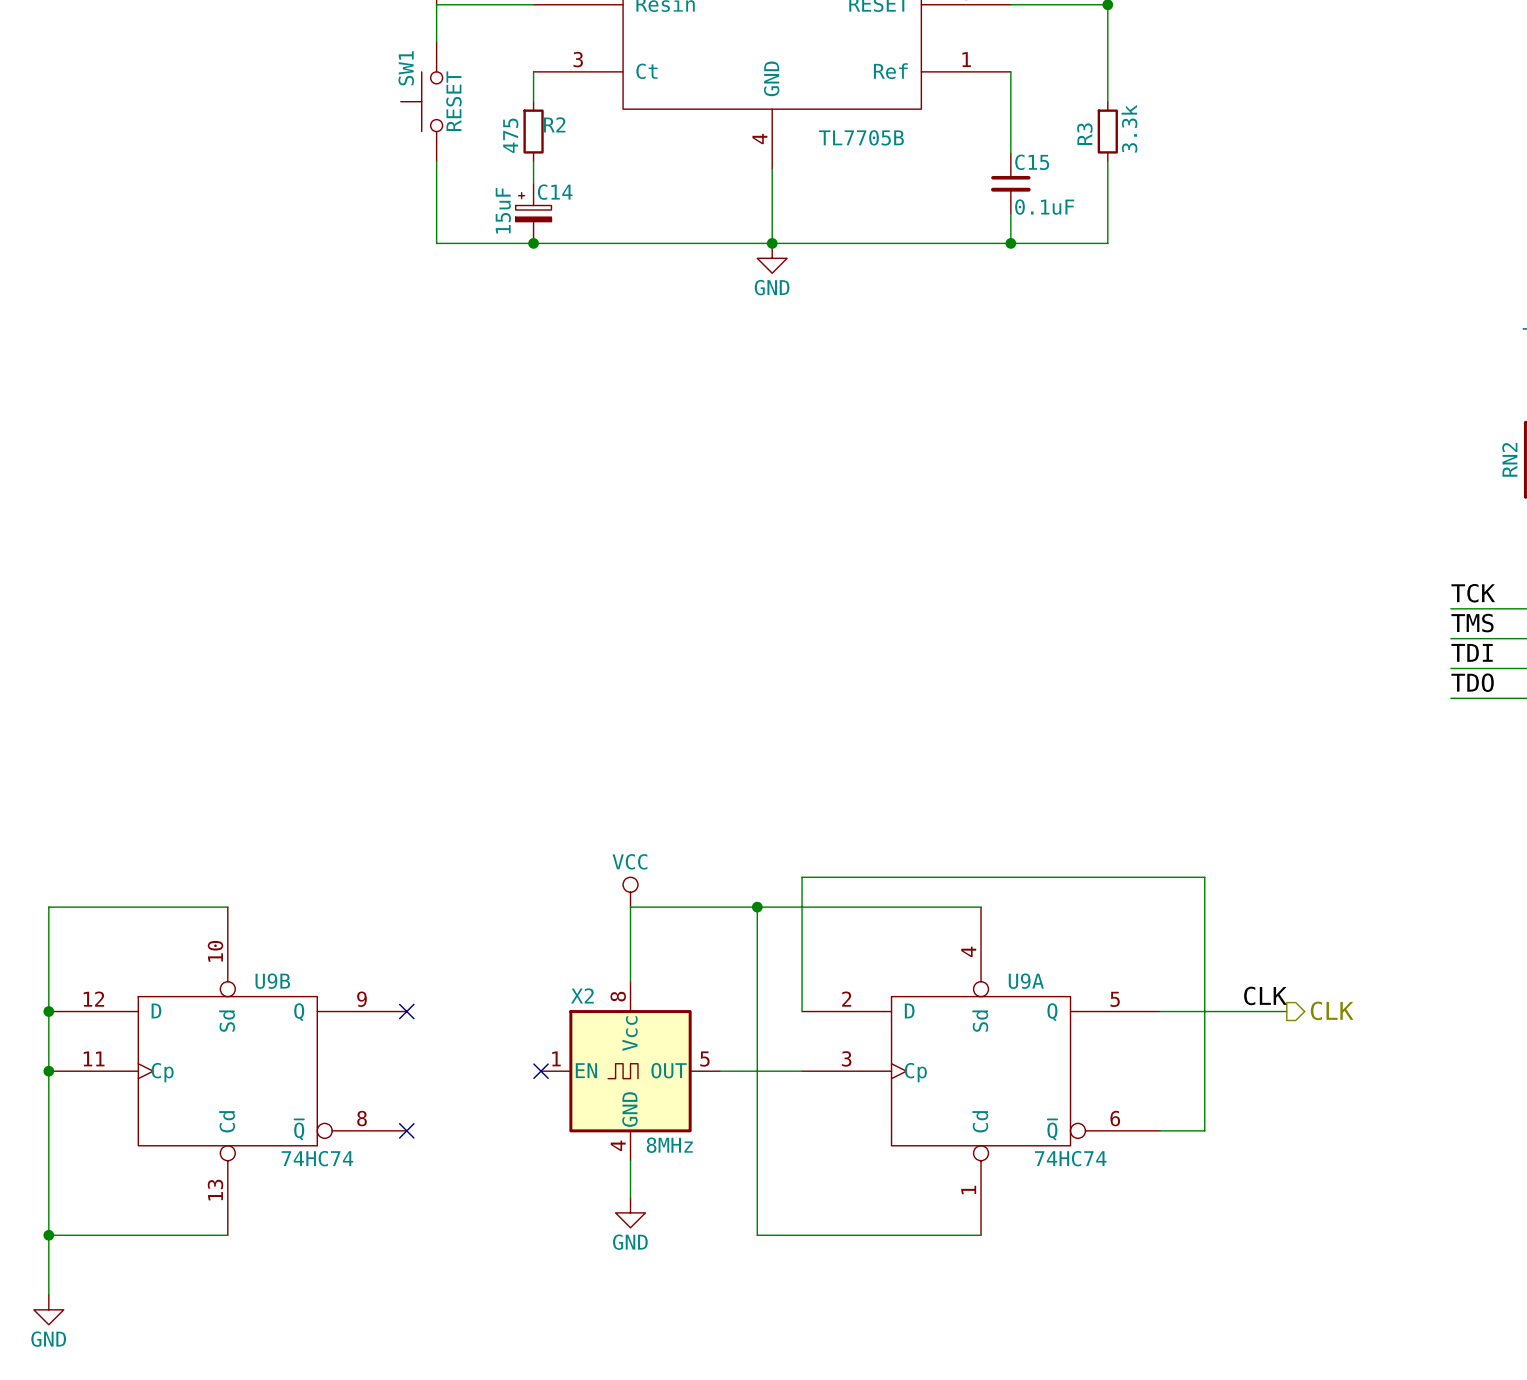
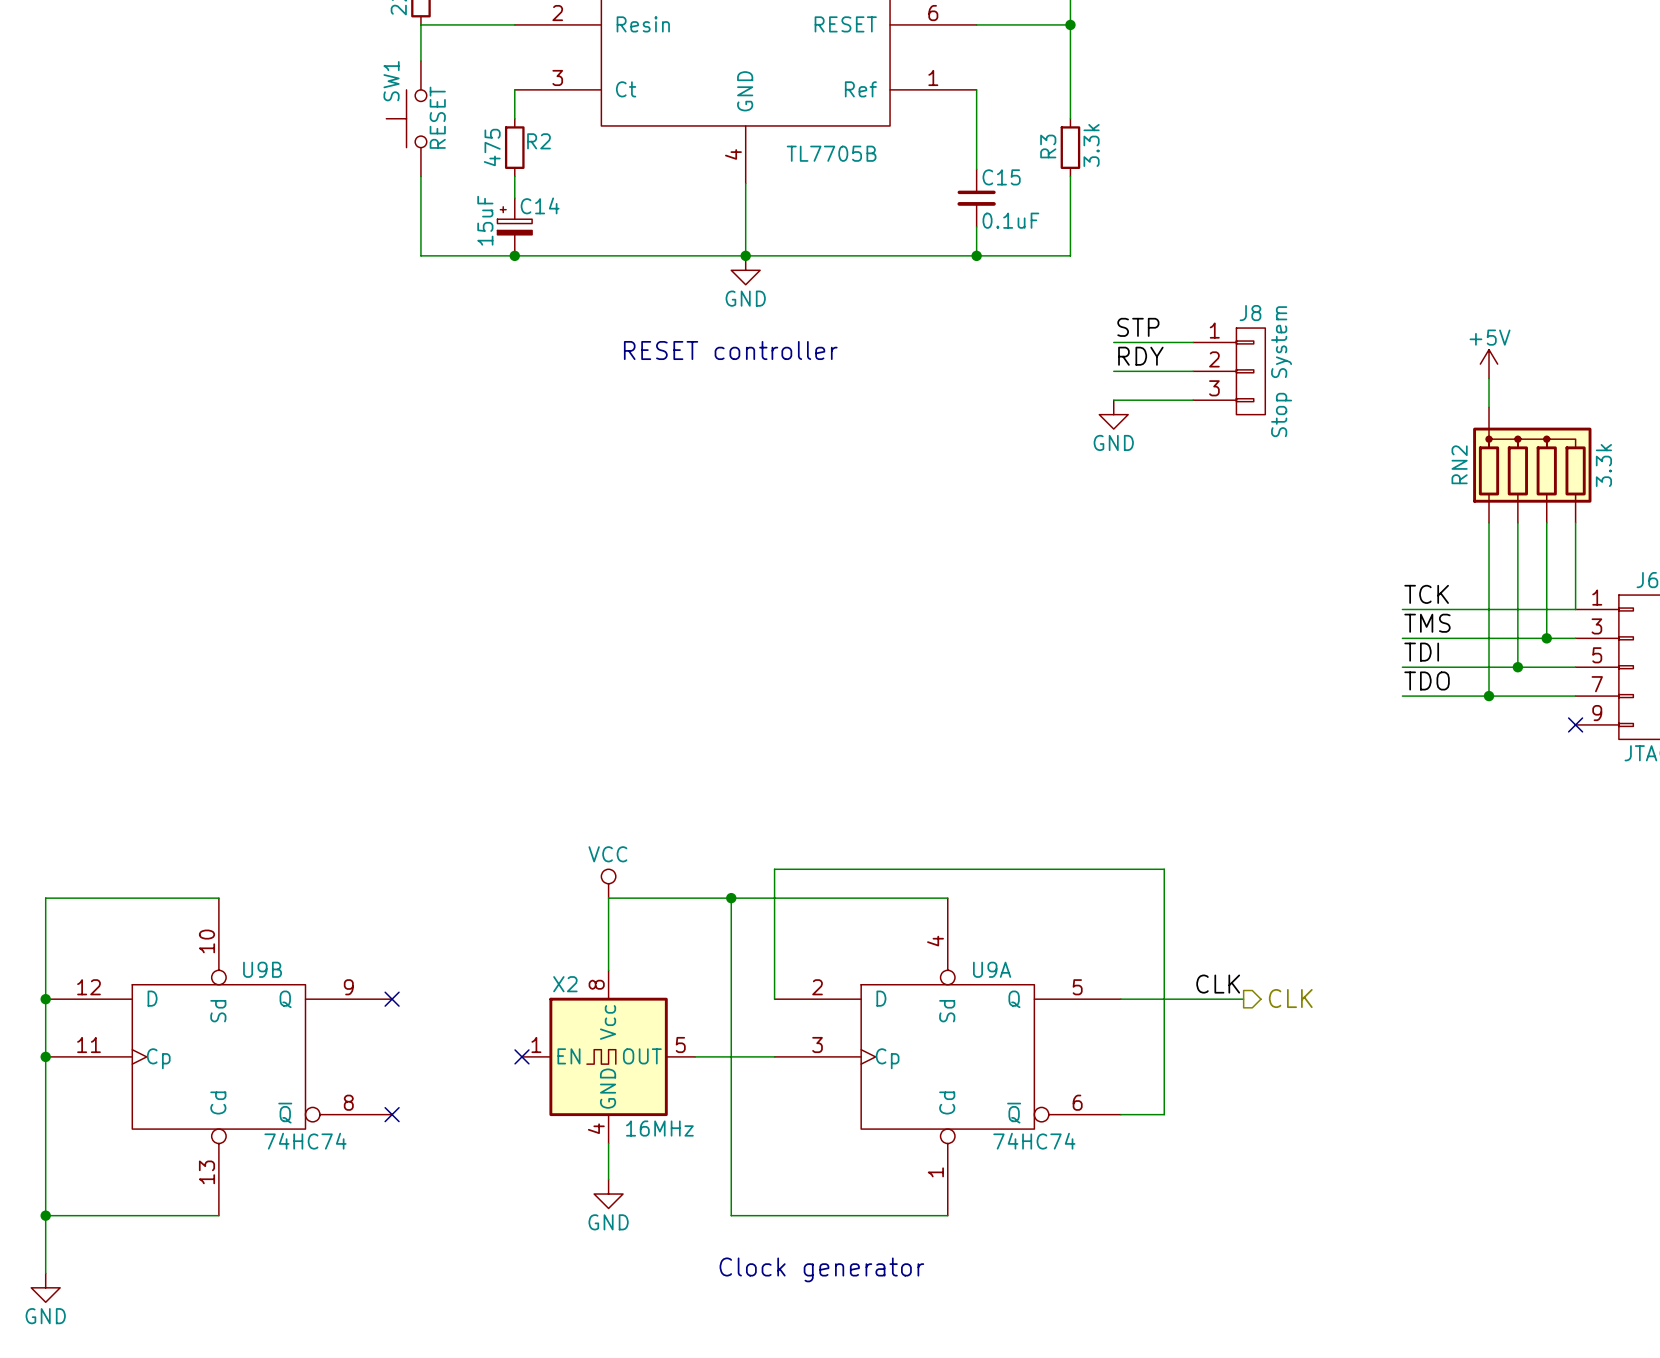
label: none -> STP (1138, 327)
wire: none -> (1113, 342) (1193, 342)
text: none -> RESET controller (730, 350)
label: none -> RDY (1140, 356)
wire: none -> (1113, 371) (1193, 371)
J8: none -> Stop System (1229, 371)
wire: none -> (1113, 400) (1193, 400)
power symbol: none -> GND (1113, 414)
X2 value: 8MHz (669, 1145) -> 16MHz (659, 1128)
text: none -> Clock generator (821, 1269)

